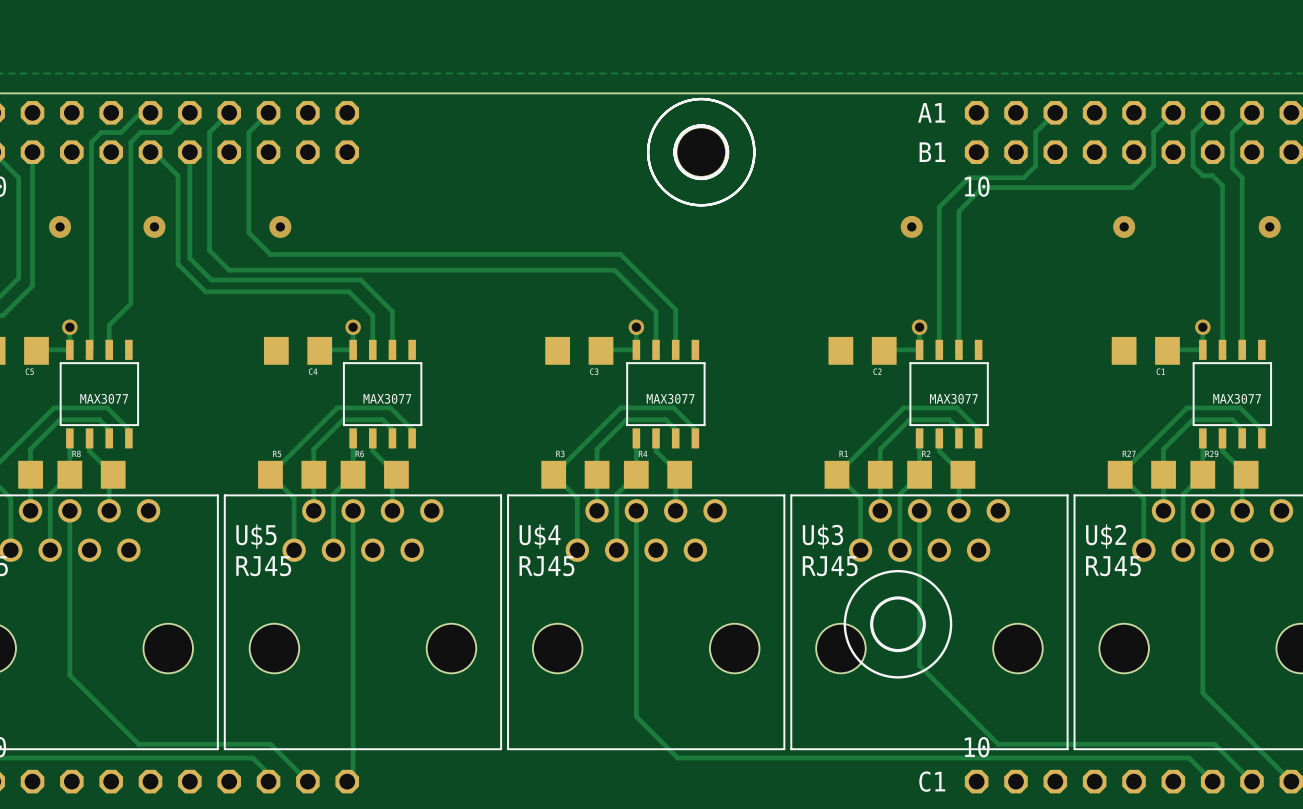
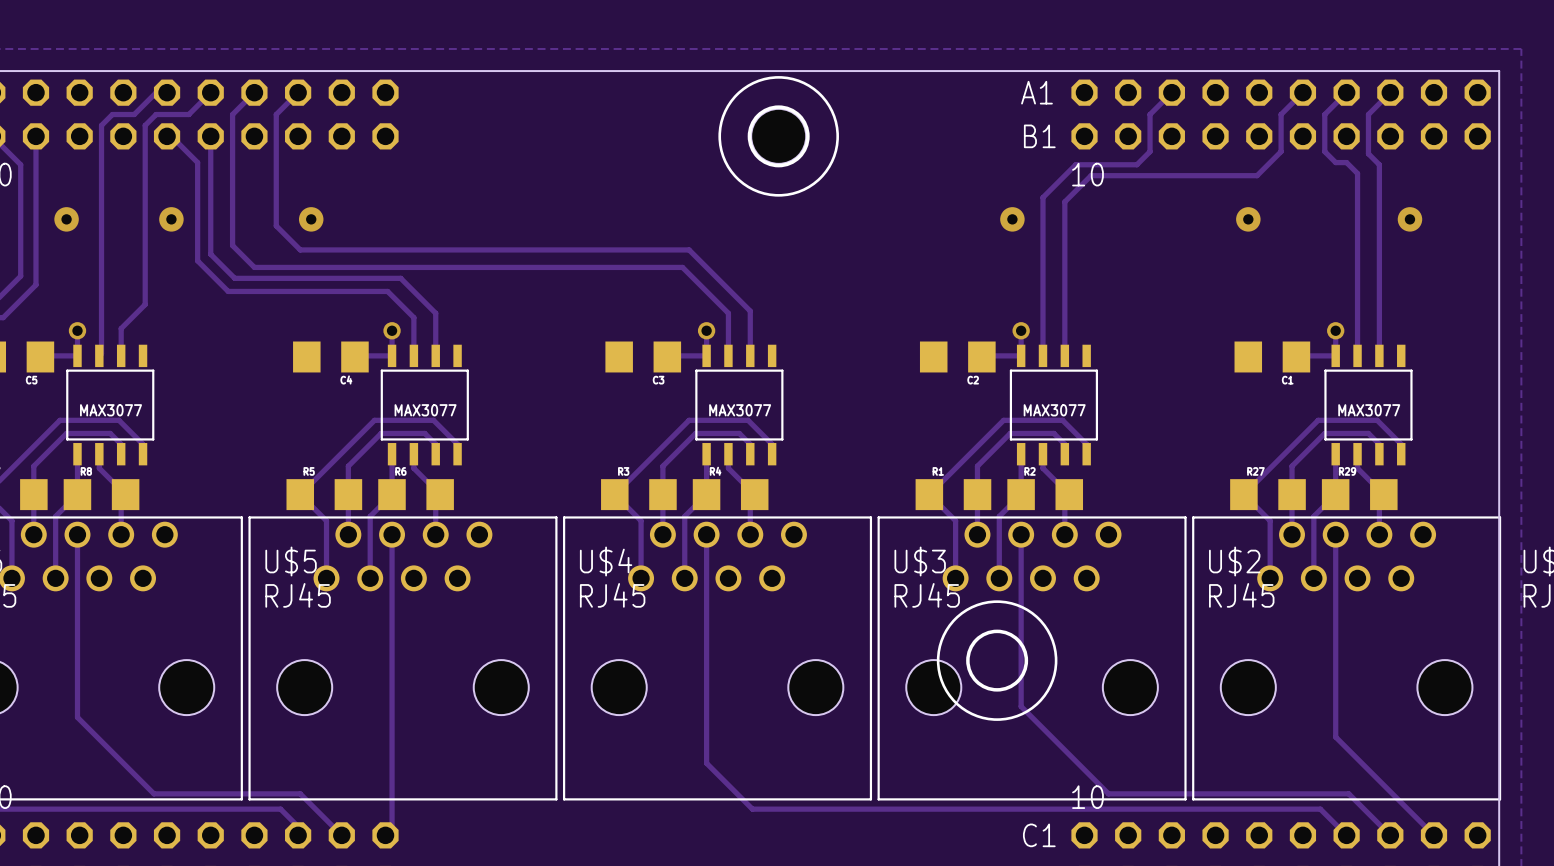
part: (701, 152) -> none
hole: none -> (778, 136)

